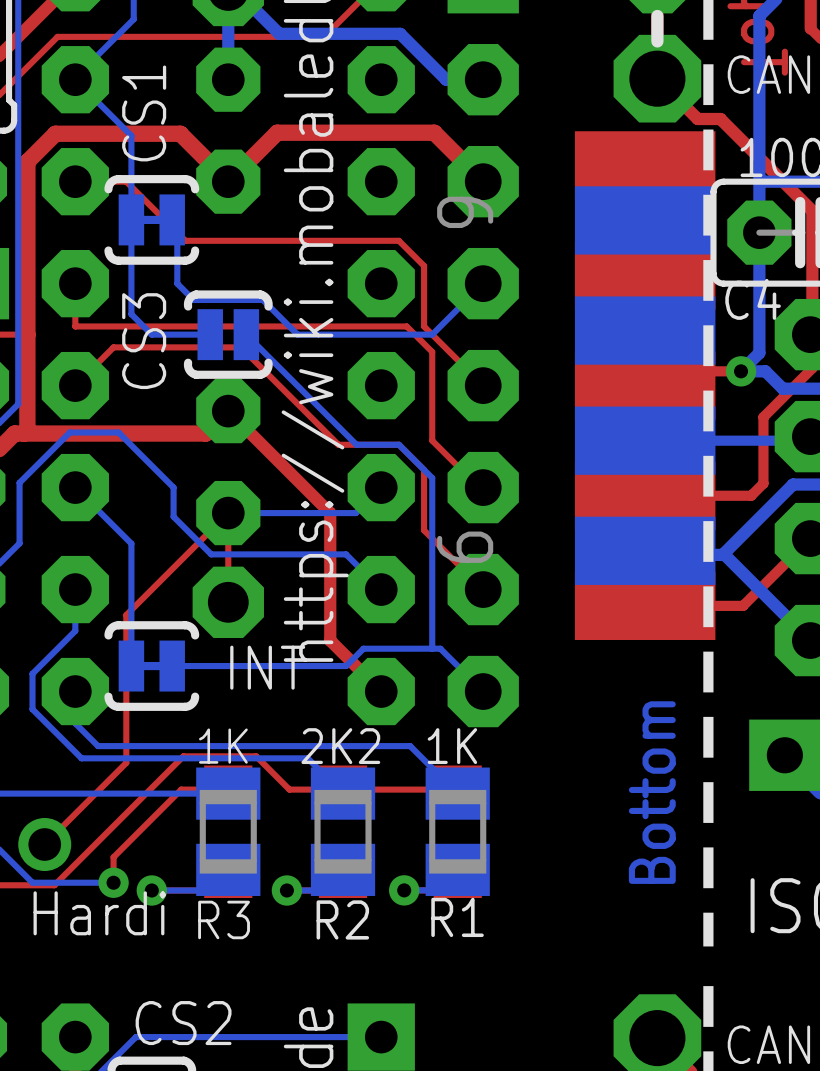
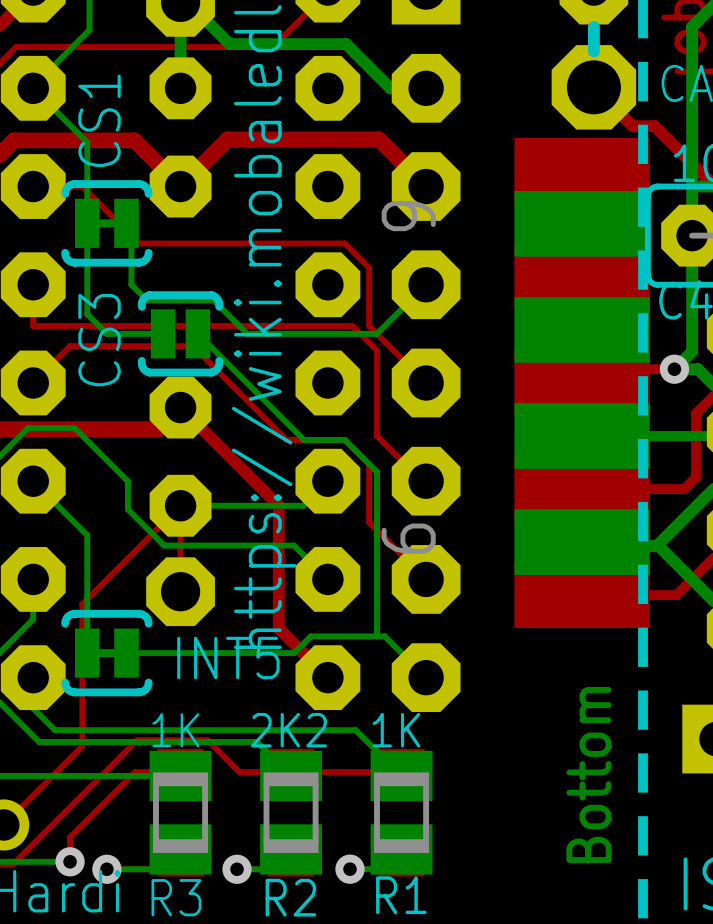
text: INT (267, 667) -> none
INT5 name: none -> INT5 (228, 658)

